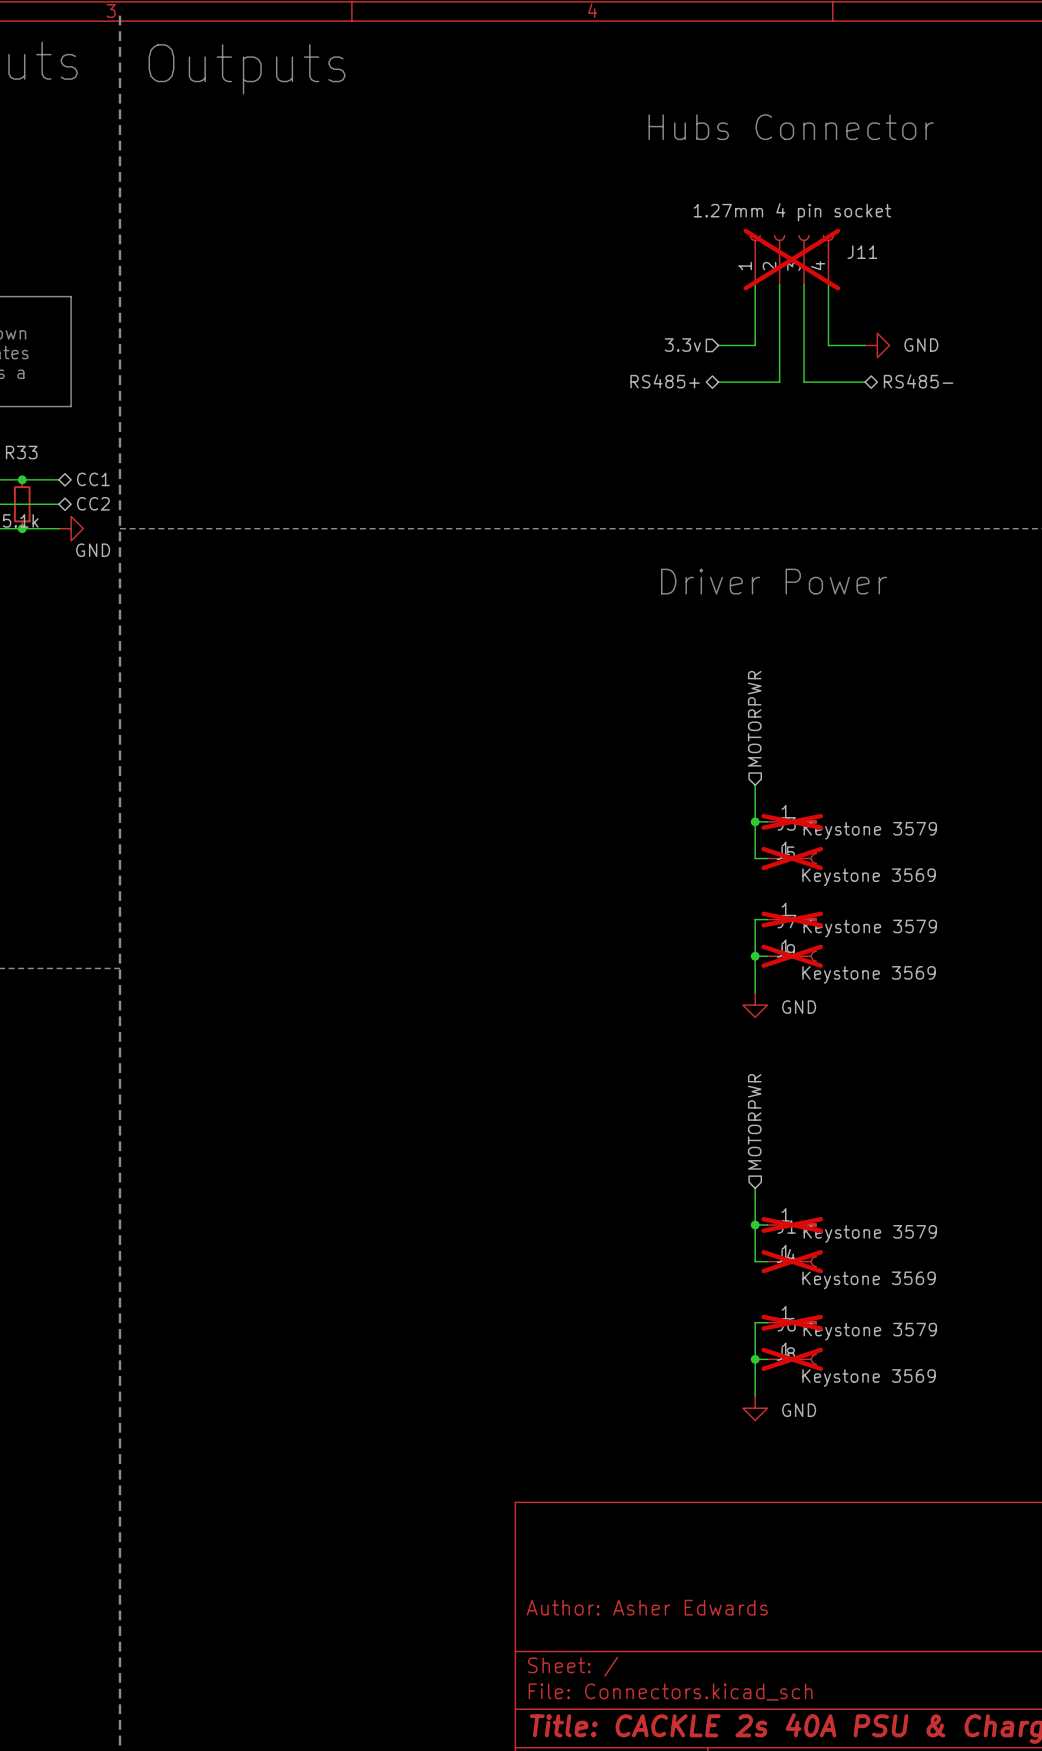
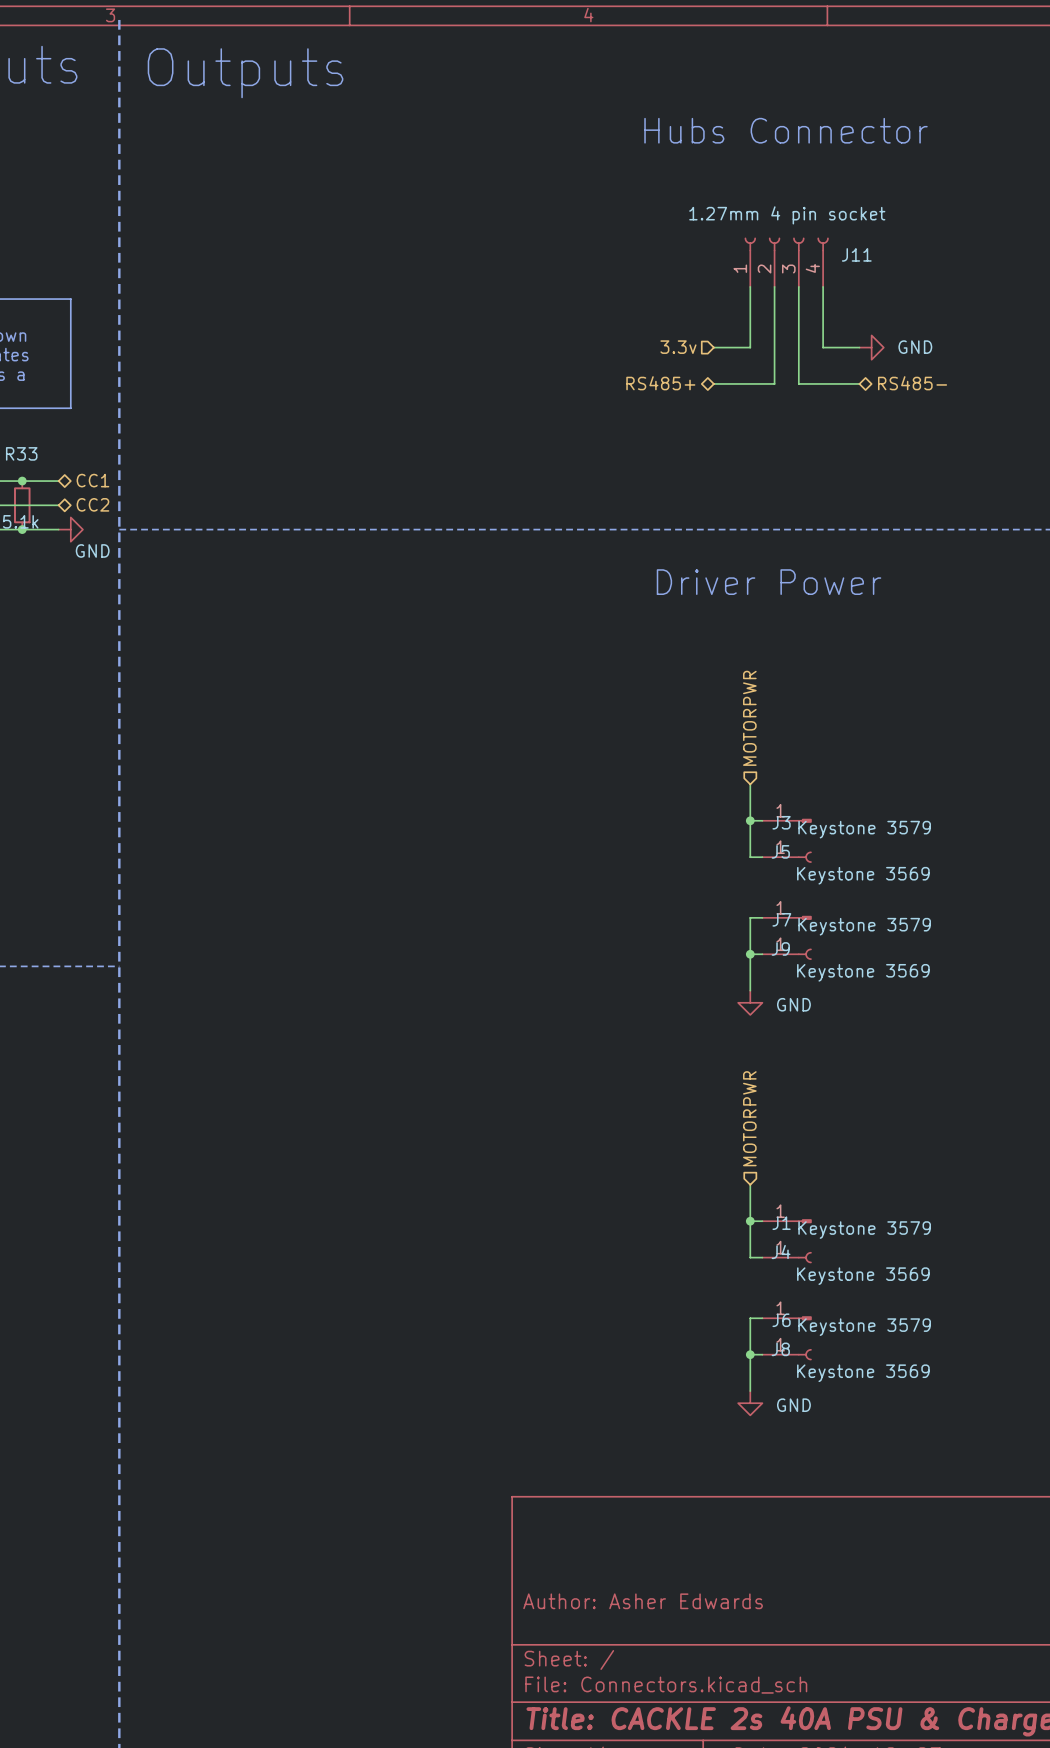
J11 do-not-place cross: (791, 259) -> none
J3 do-not-place cross: (792, 821) -> none
J5 do-not-place cross: (792, 858) -> none
J7 do-not-place cross: (792, 919) -> none
J9 do-not-place cross: (792, 956) -> none
J1 do-not-place cross: (792, 1225) -> none
J4 do-not-place cross: (792, 1261) -> none
J6 do-not-place cross: (792, 1322) -> none
J8 do-not-place cross: (792, 1359) -> none

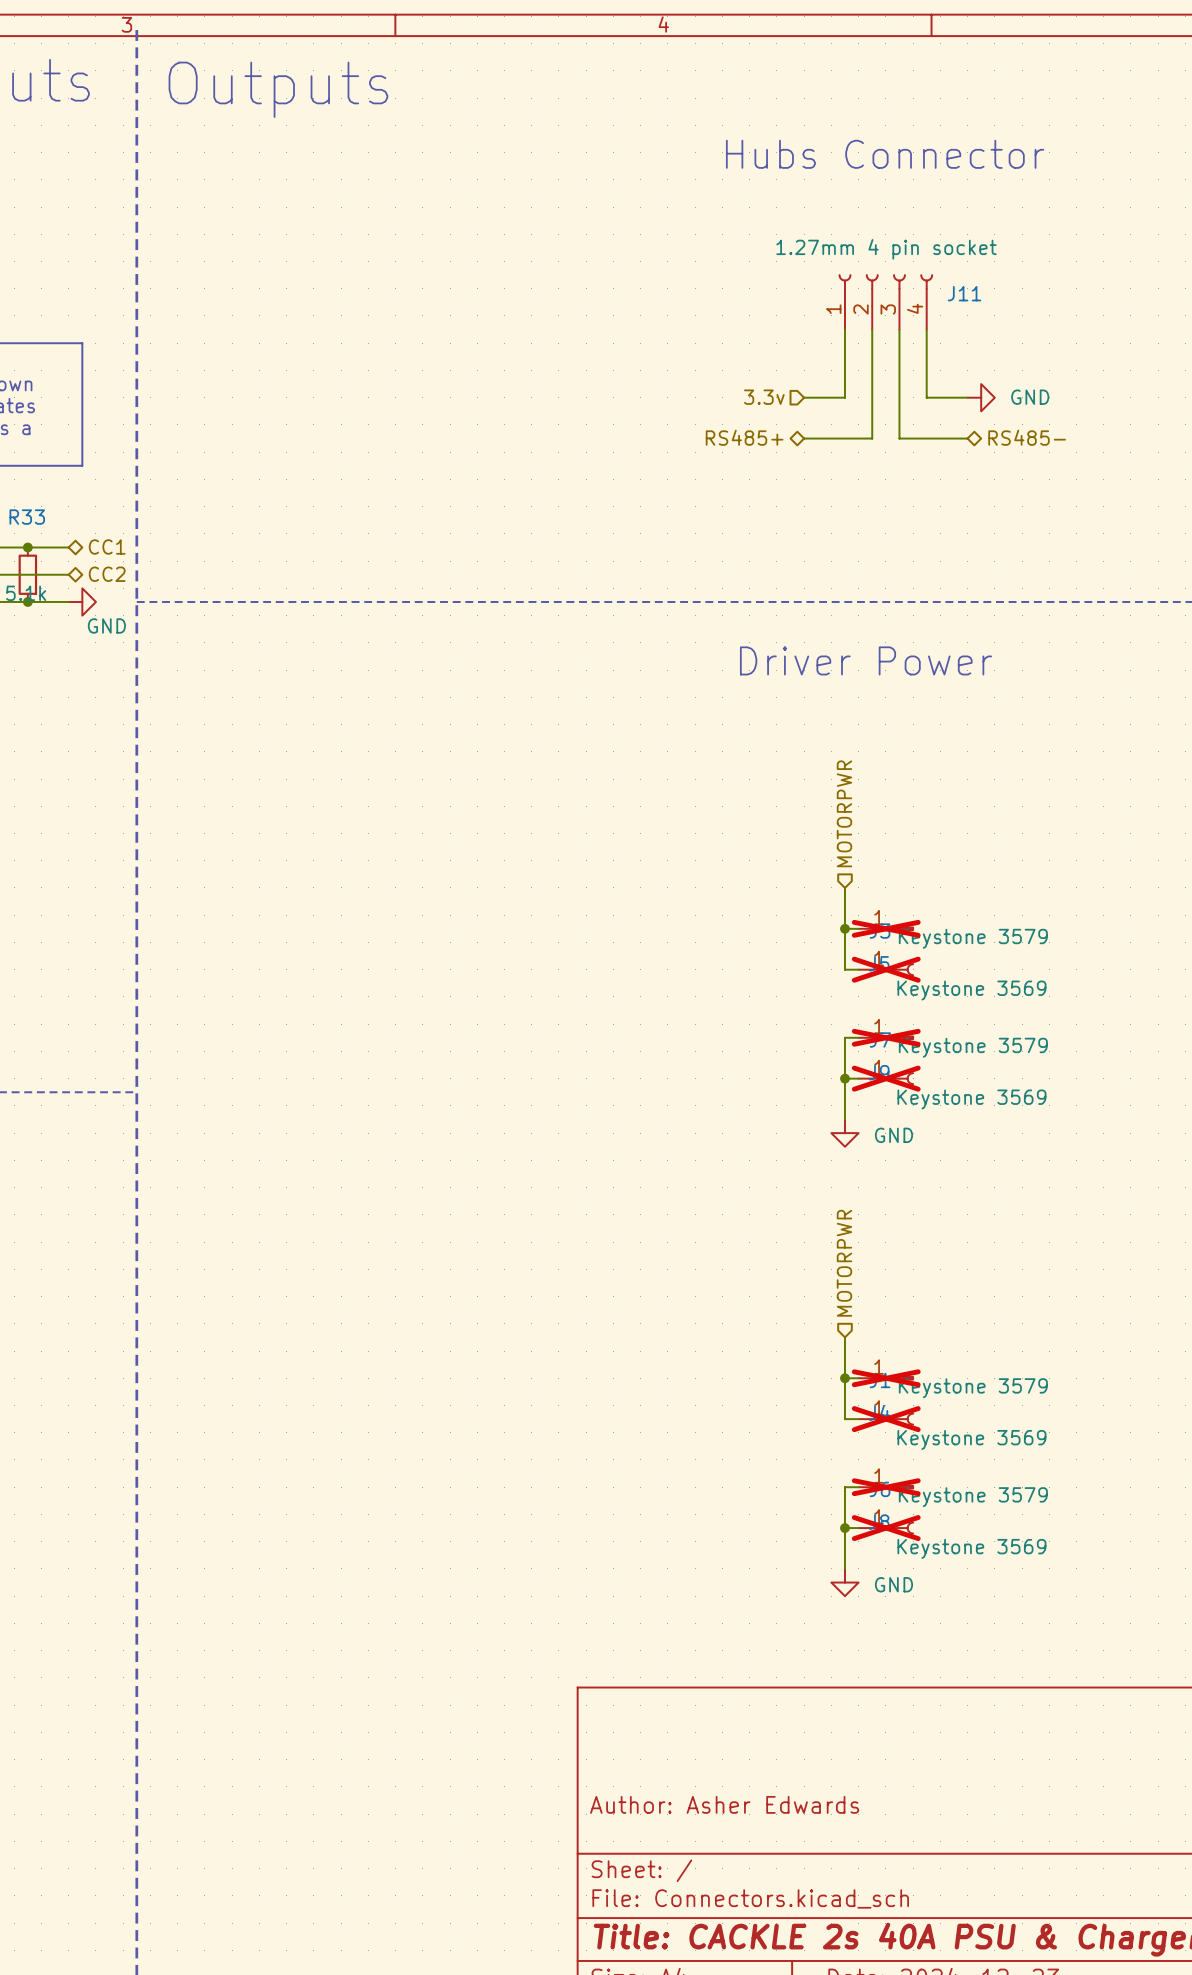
J3 do-not-place cross: none -> (886, 928)
J5 do-not-place cross: none -> (886, 969)
J7 do-not-place cross: none -> (886, 1037)
J9 do-not-place cross: none -> (886, 1078)
J1 do-not-place cross: none -> (886, 1378)
J4 do-not-place cross: none -> (886, 1419)
J6 do-not-place cross: none -> (886, 1487)
J8 do-not-place cross: none -> (886, 1528)

